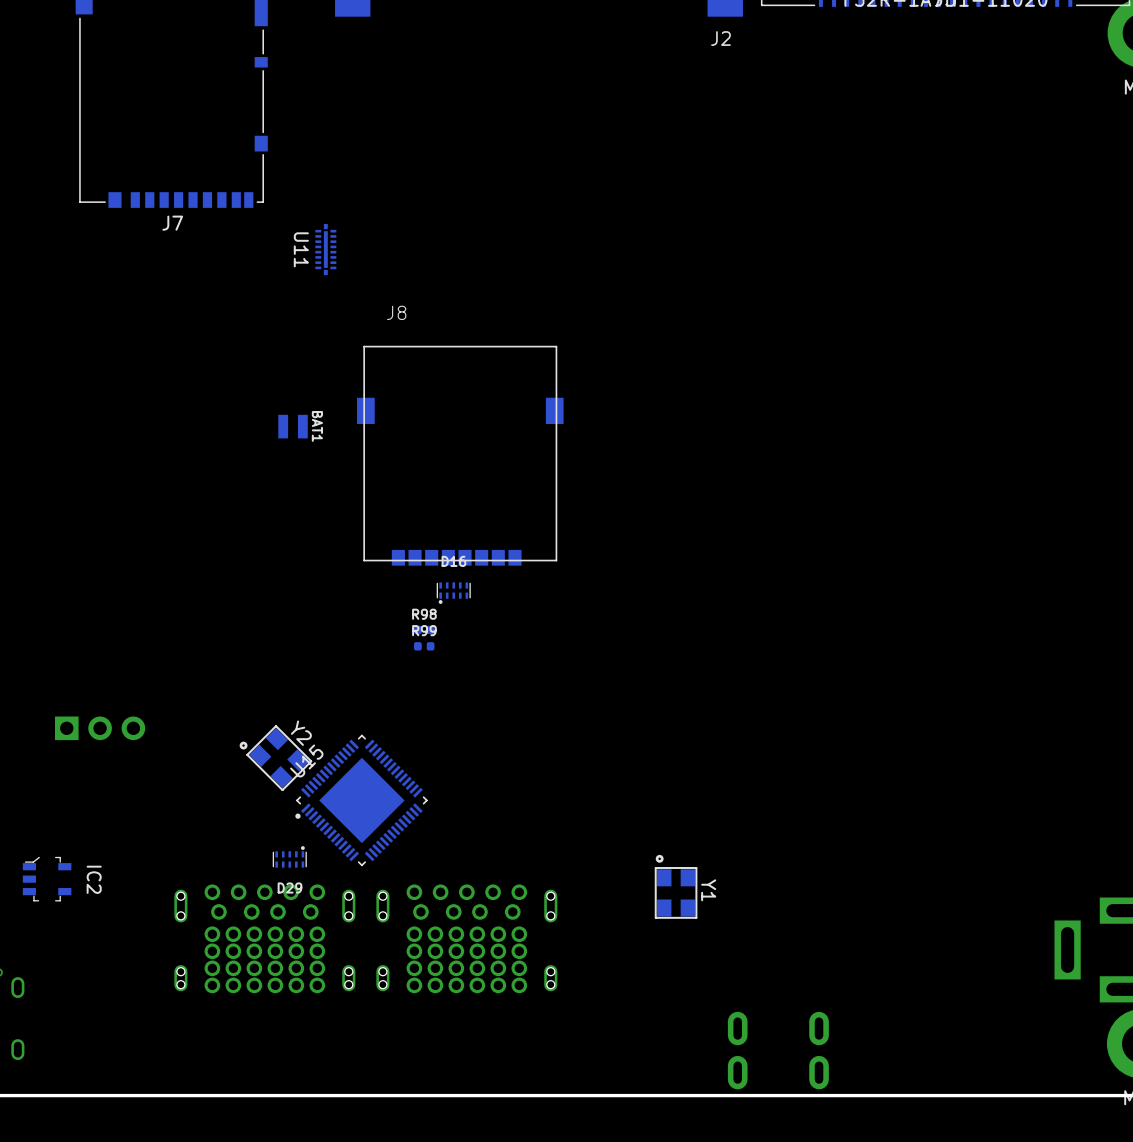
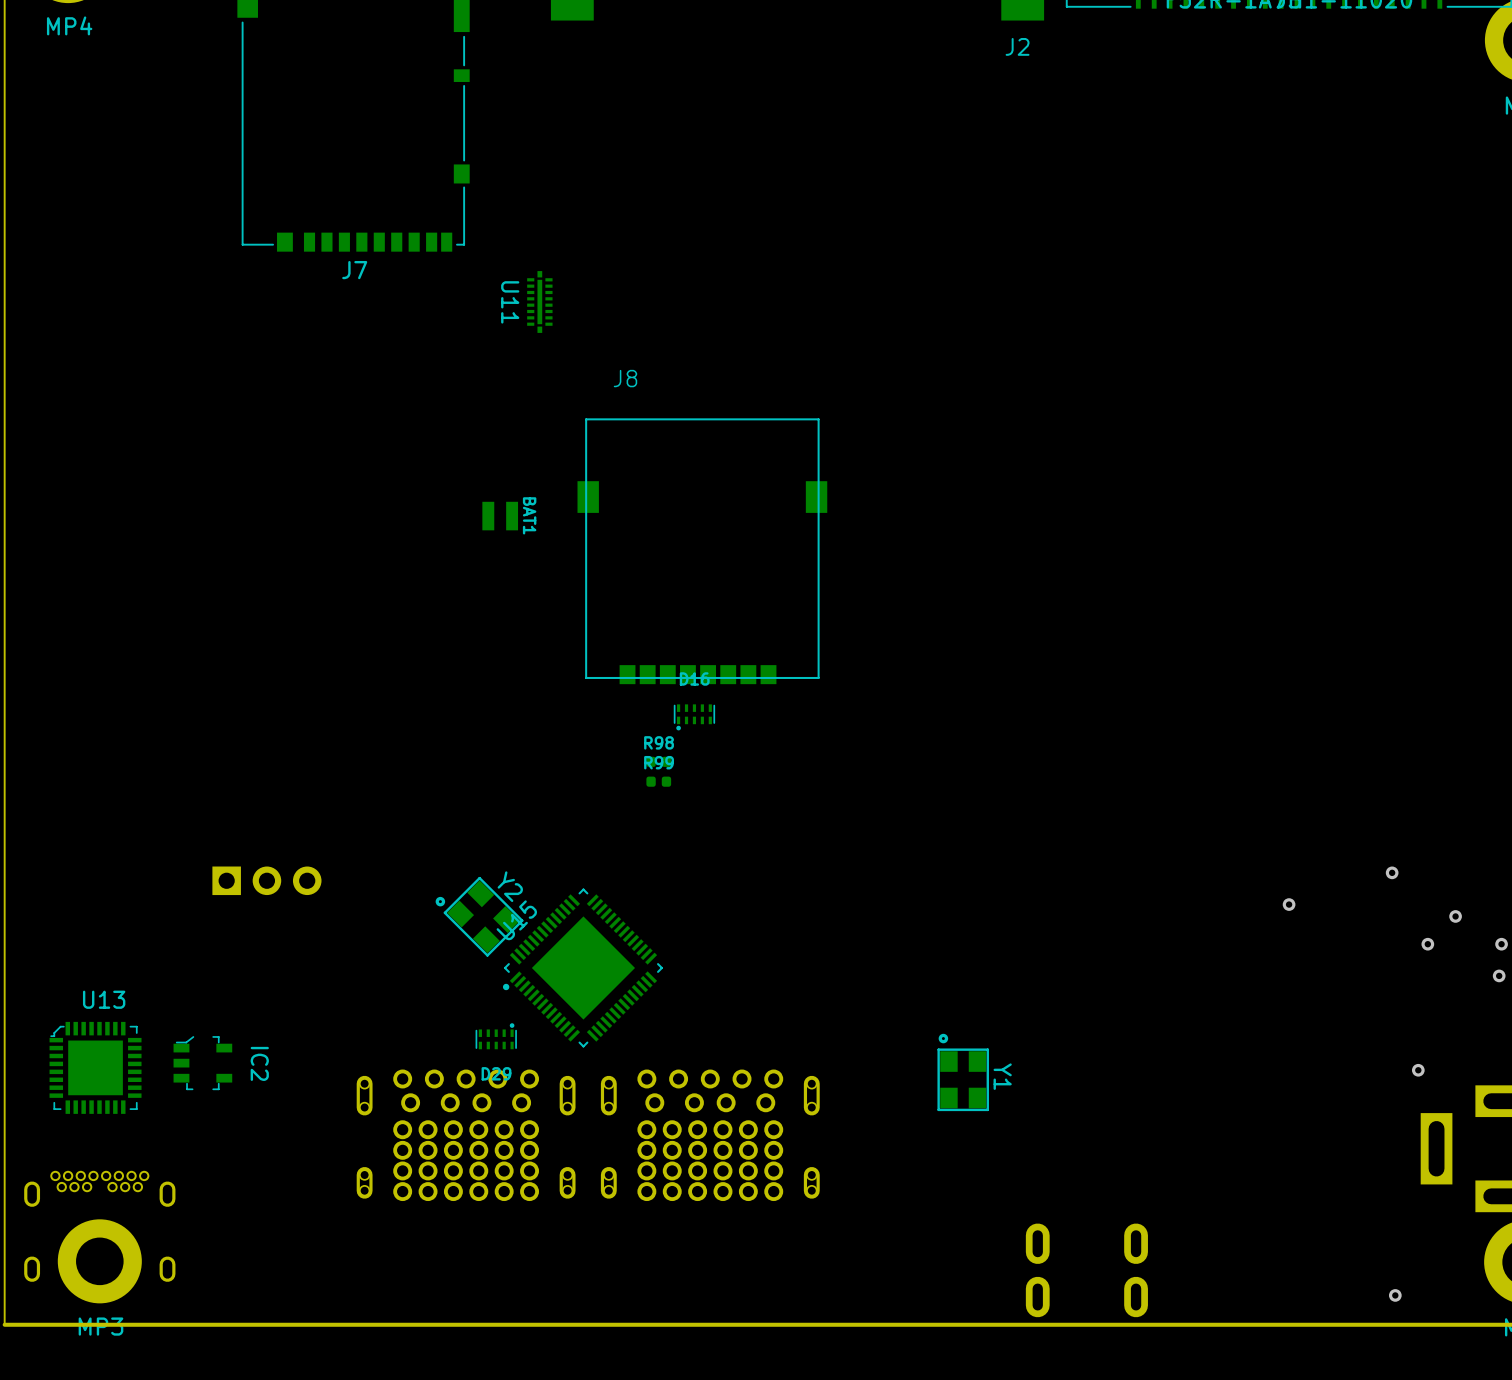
via: none -> (1392, 872)
via: none -> (1289, 904)
via: none -> (1455, 916)
via: none -> (1427, 944)
via: none -> (1501, 944)
via: none -> (1499, 975)
via: none -> (1418, 1070)
via: none -> (1395, 1295)

